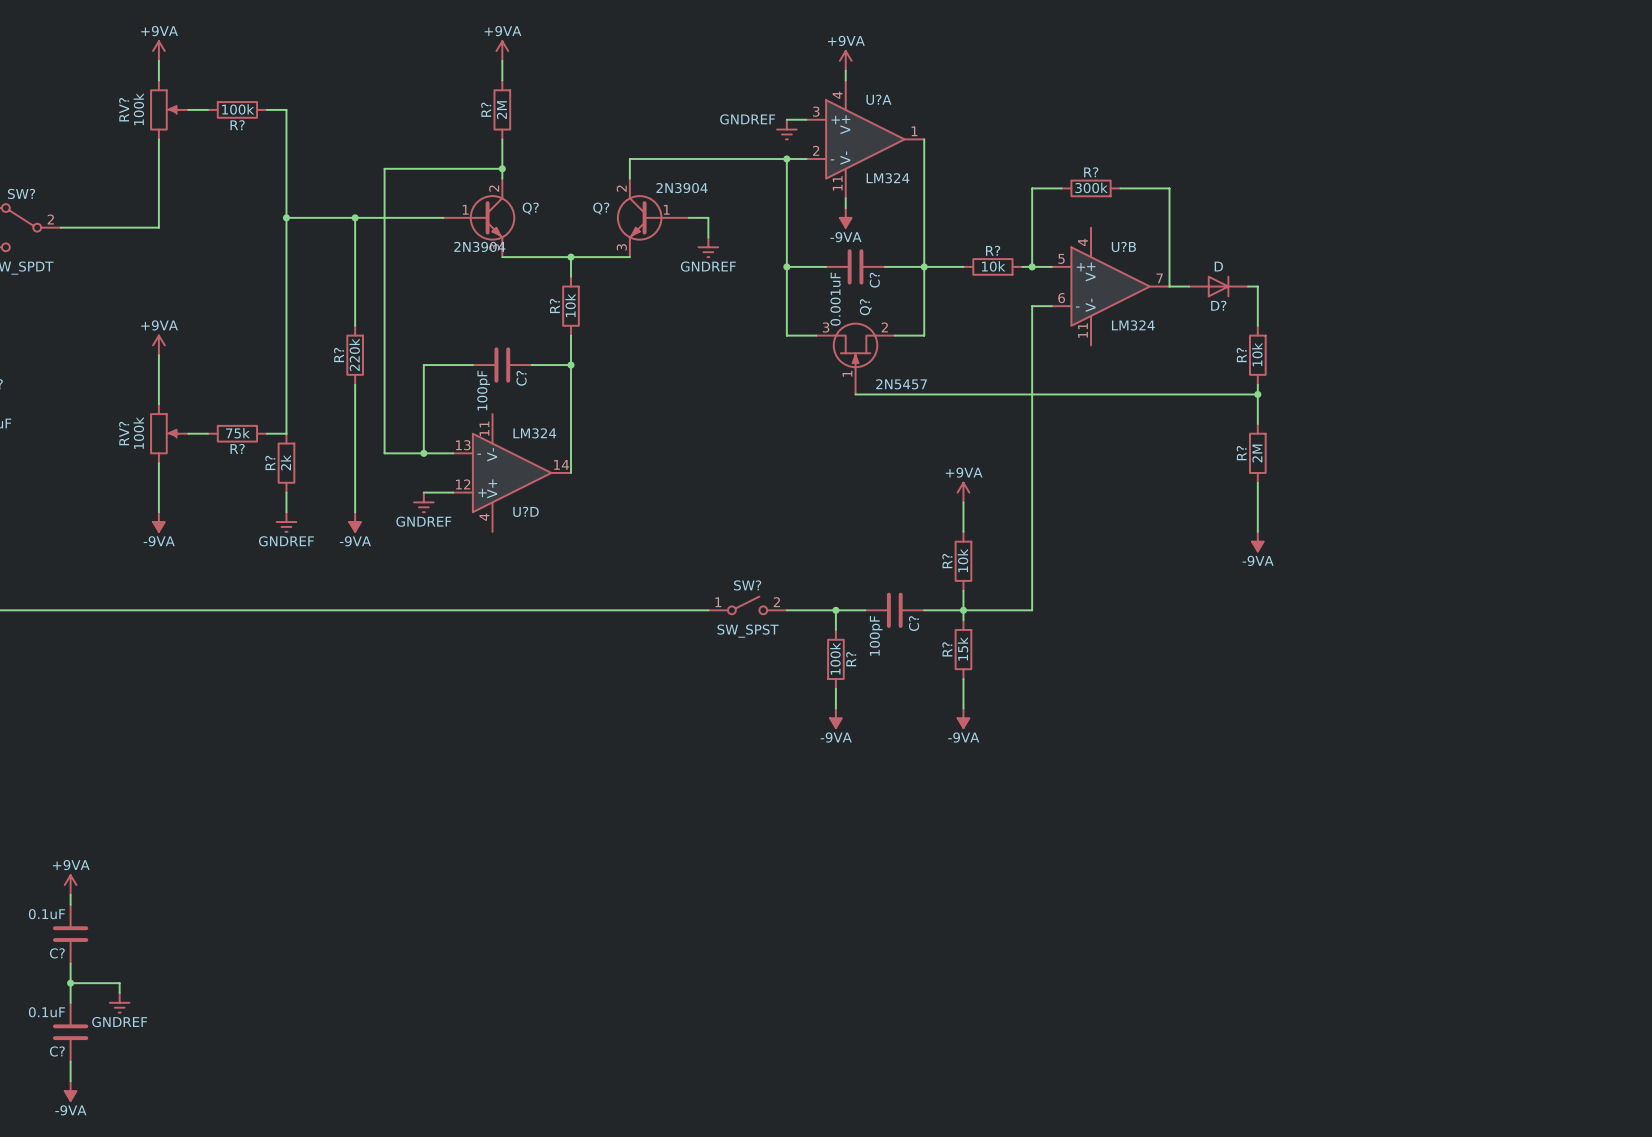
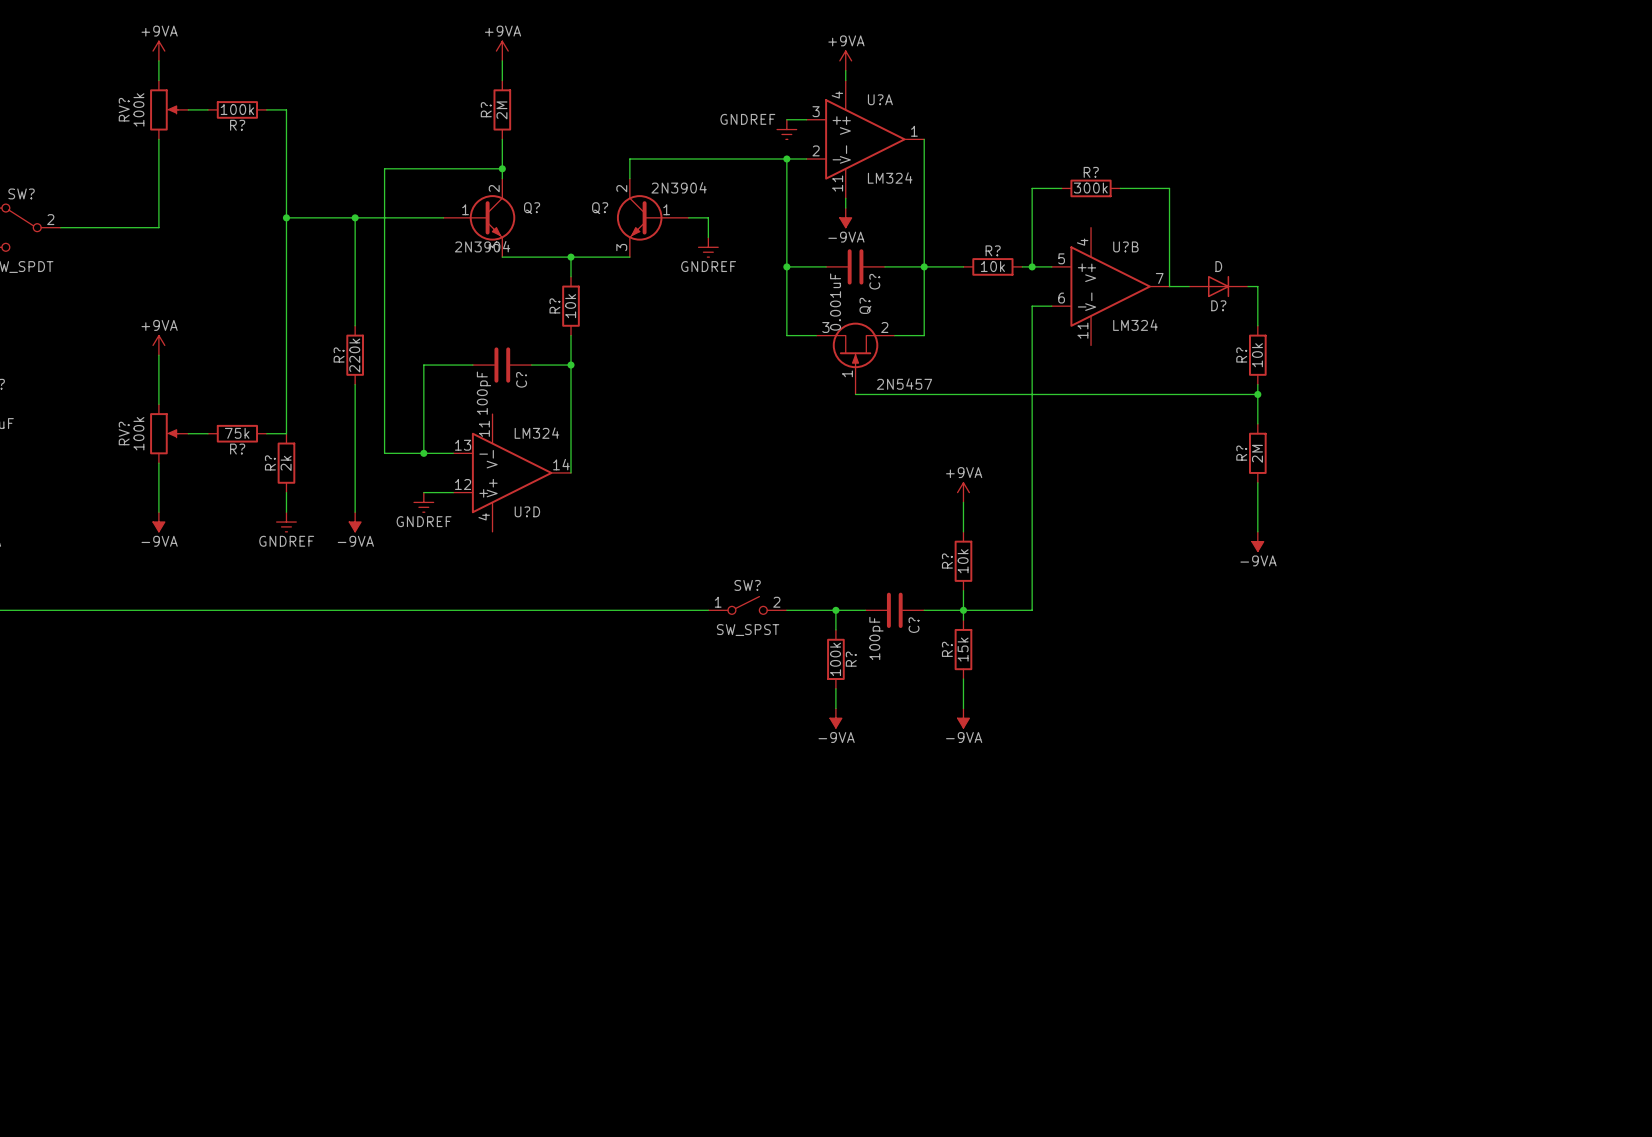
power symbol: +9VA (70, 885) -> none
wire: (70, 894) (70, 904) -> none
C?: 0.1uF (70, 934) -> none
wire: (70, 963) (70, 1002) -> none
wire: (70, 983) (119, 983) (119, 992) -> none
junction: (70, 983) -> none
power symbol: GNDREF (119, 1002) -> none
C?: 0.1uF (70, 1032) -> none
wire: (70, 1061) (70, 1081) -> none
power symbol: -9VA (70, 1091) -> none

